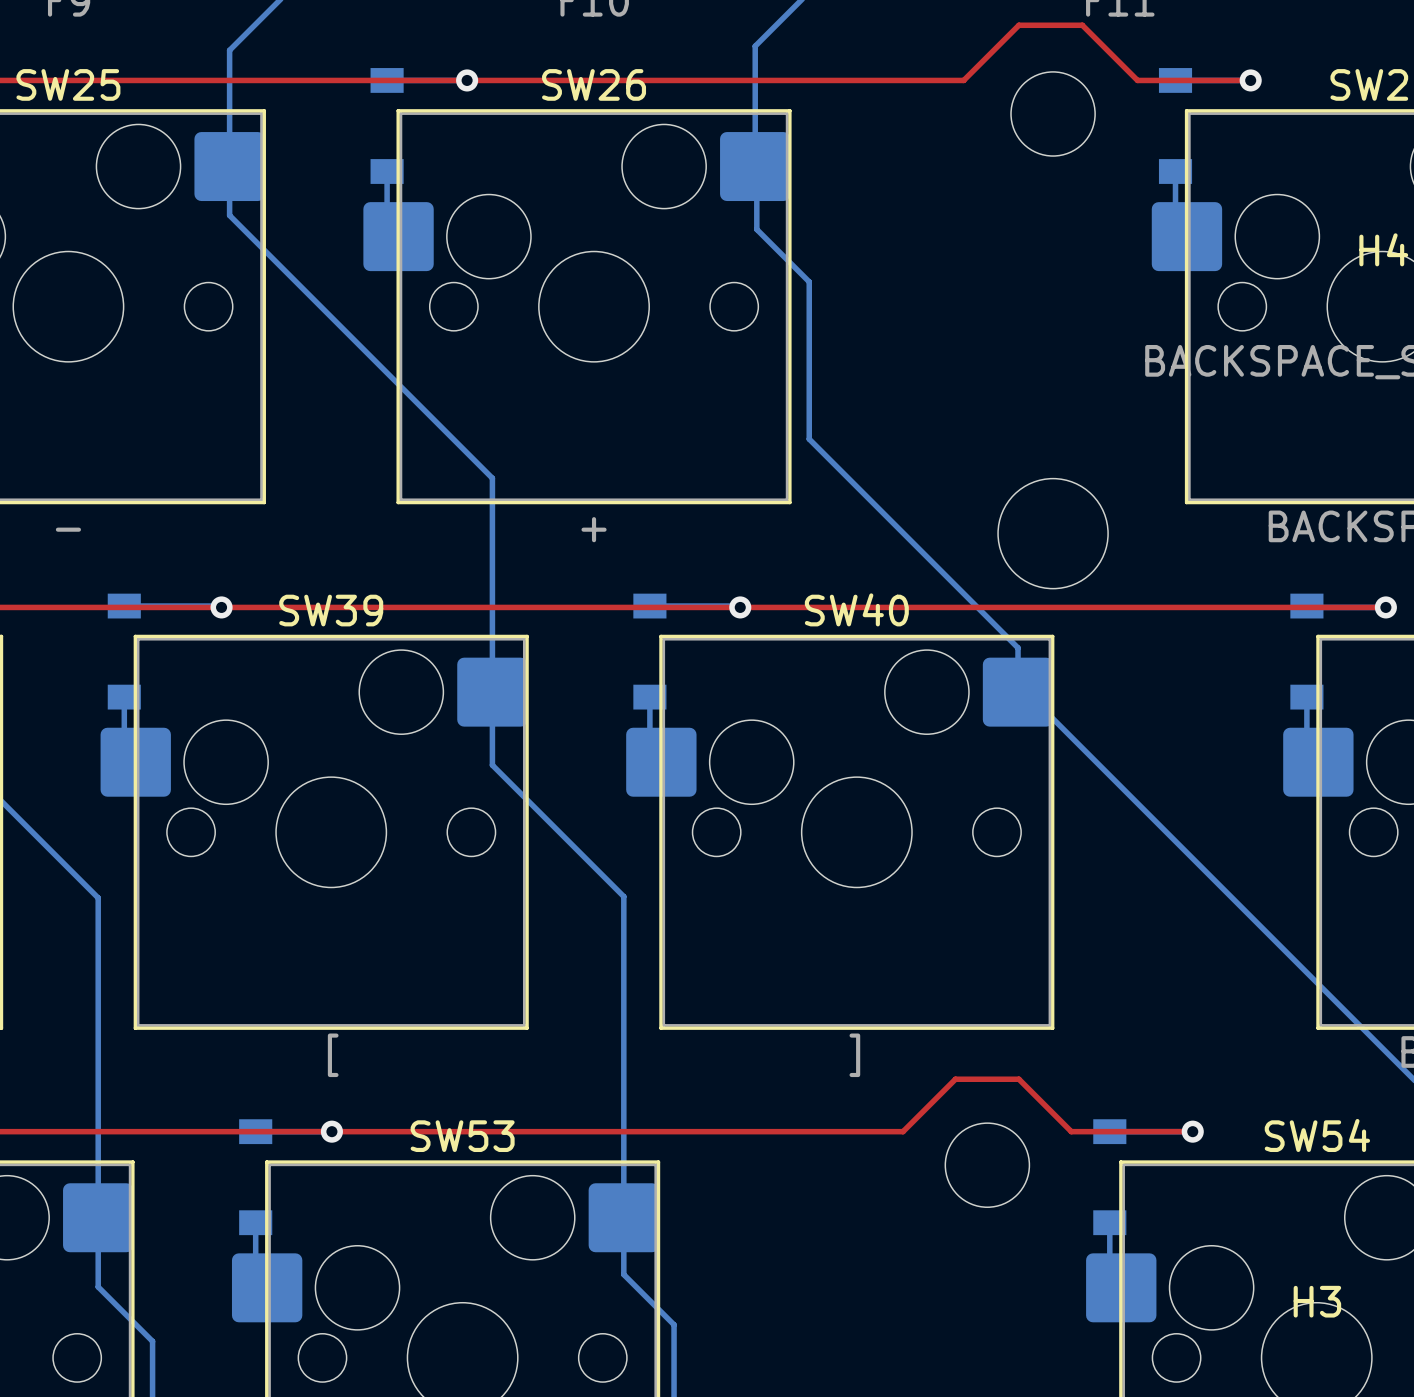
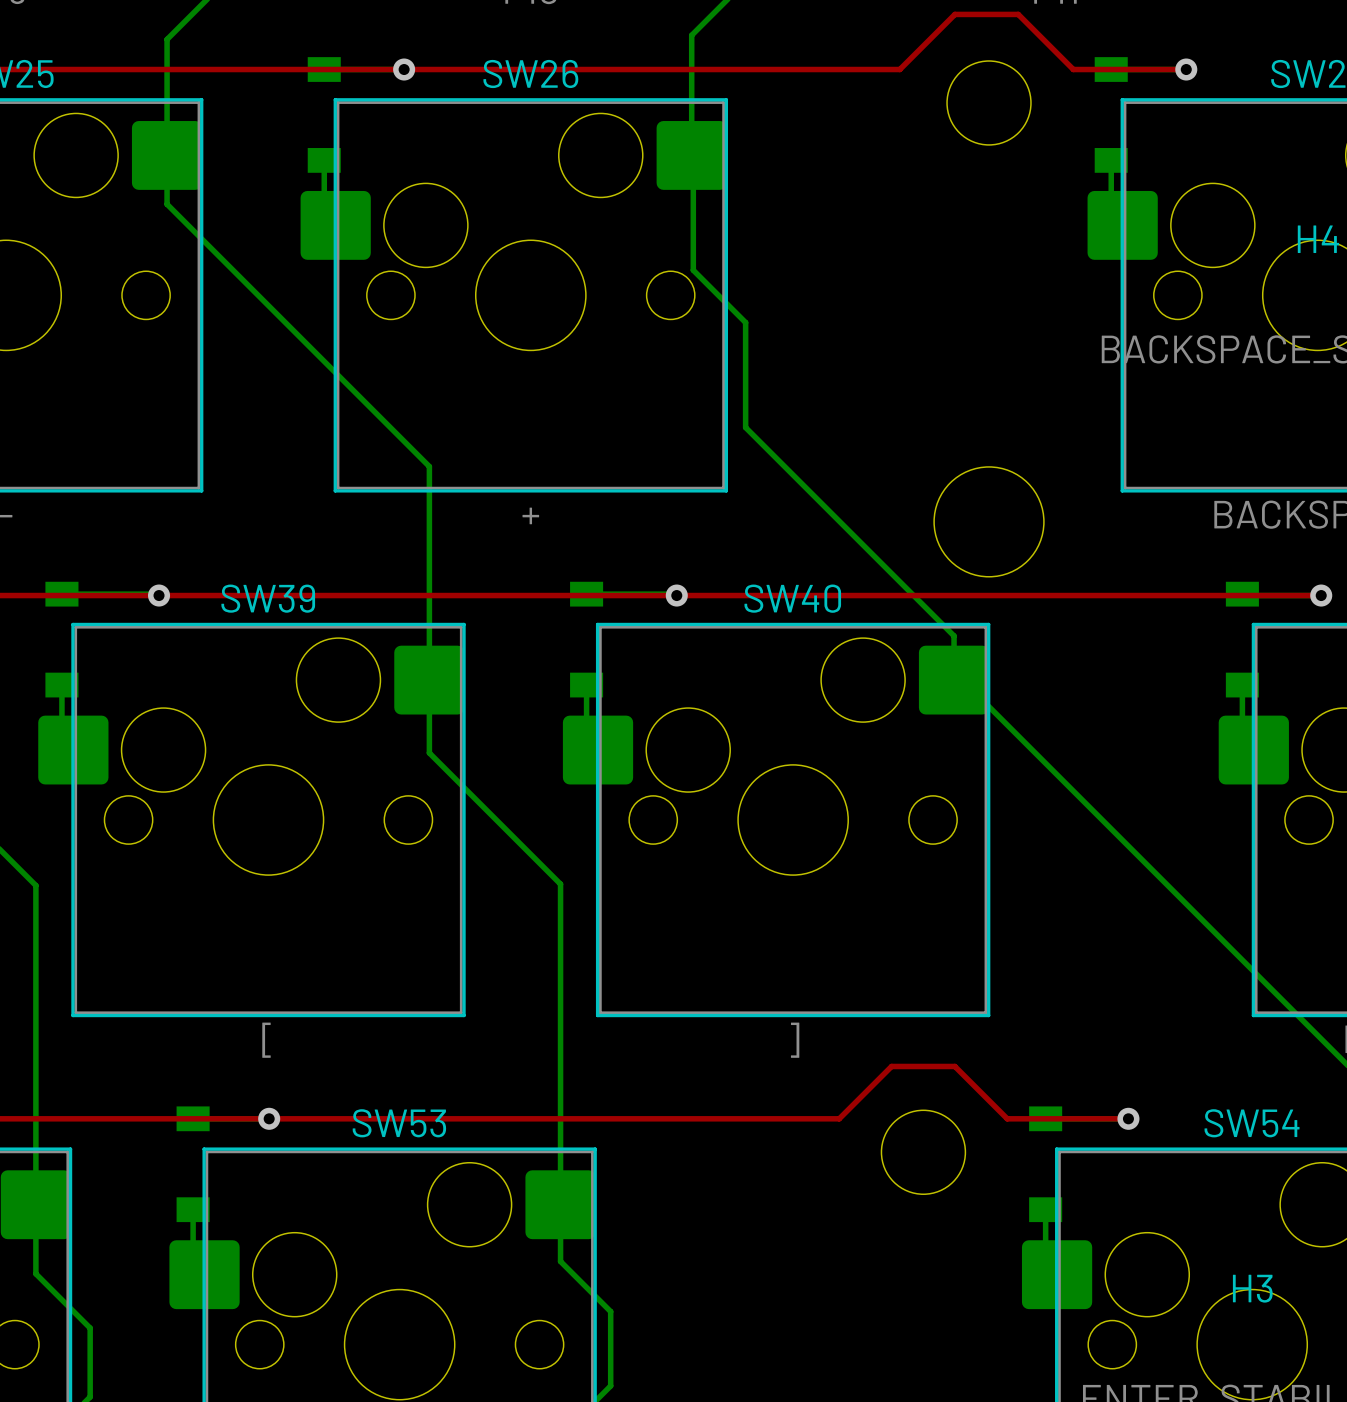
bottom track: (756, 229) (809, 281) (809, 333) -> (693, 218) (693, 270) (745, 322)

